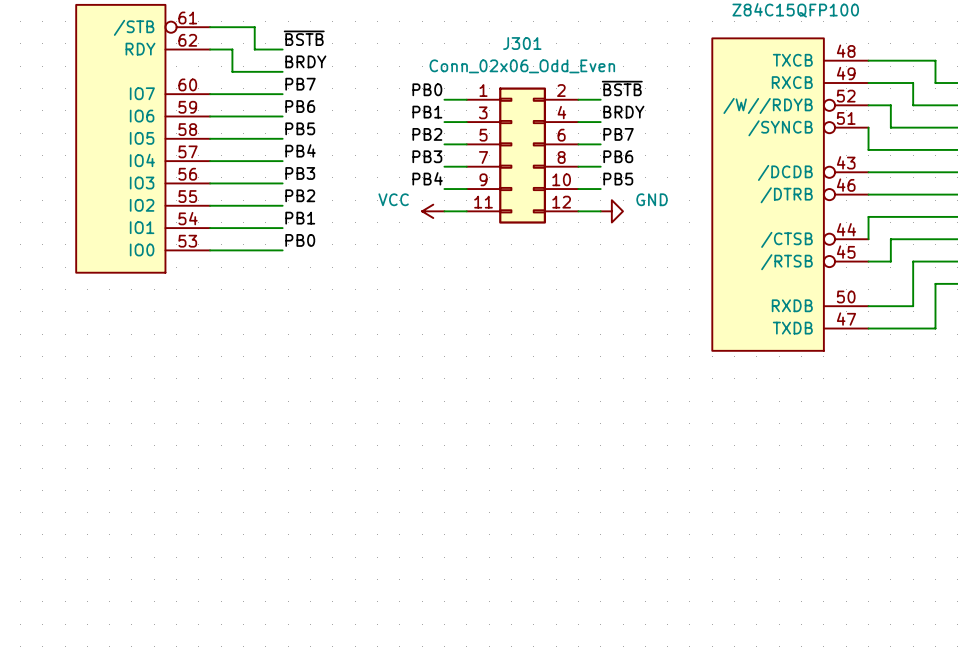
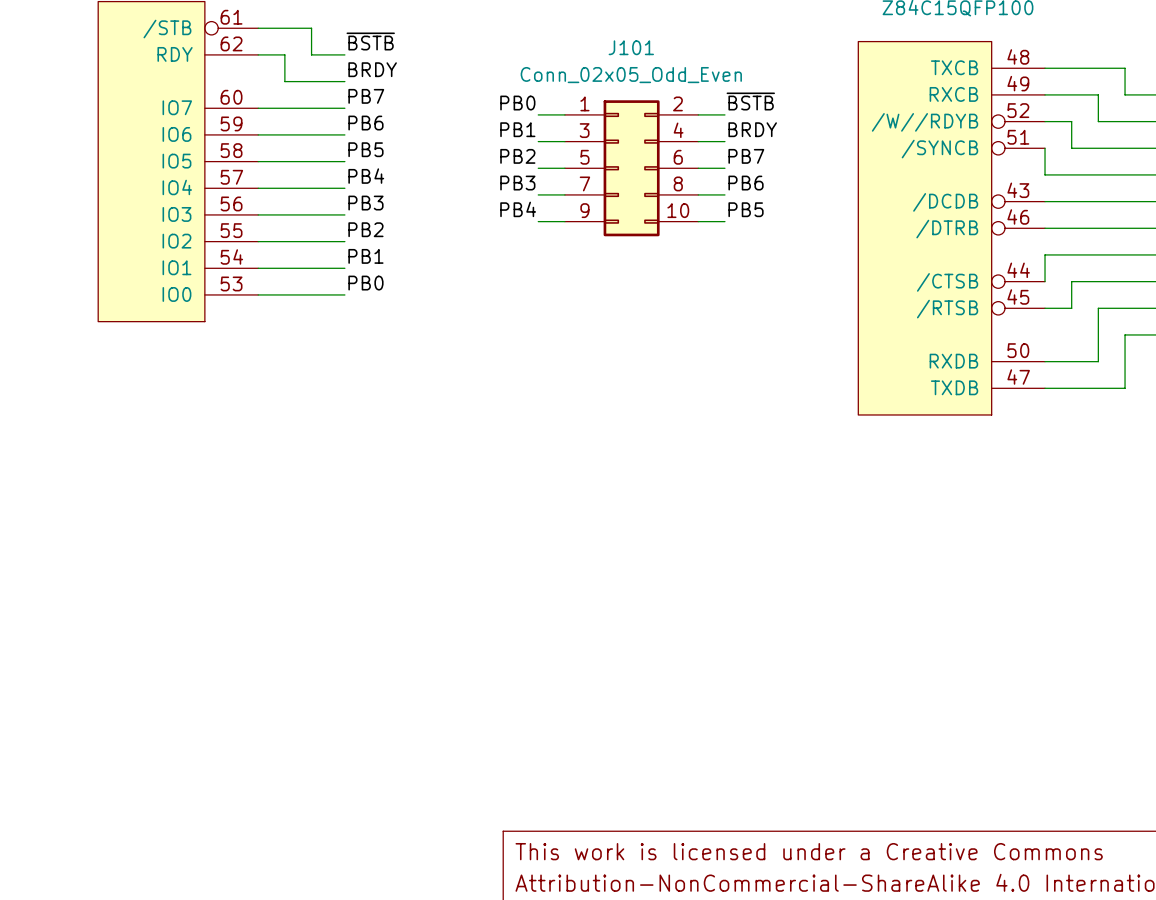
J101: none -> Conn_02x05_Odd_Even (631, 168)
J301: Conn_02x06_Odd_Even (522, 155) -> none
power symbol: VCC (433, 211) -> none
wire: (444, 211) (466, 211) -> none
wire: (578, 211) (600, 211) -> none
power symbol: GND (611, 211) -> none

